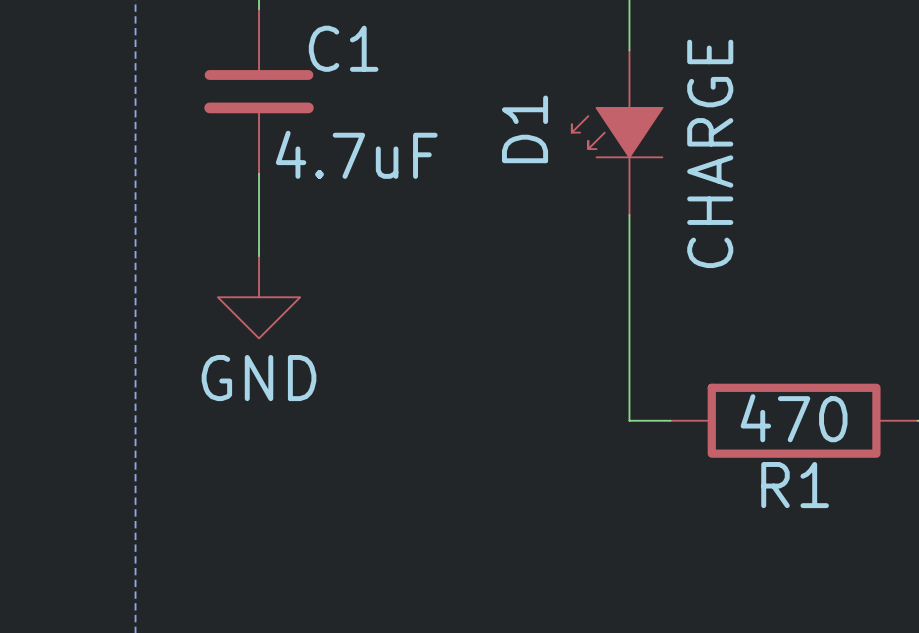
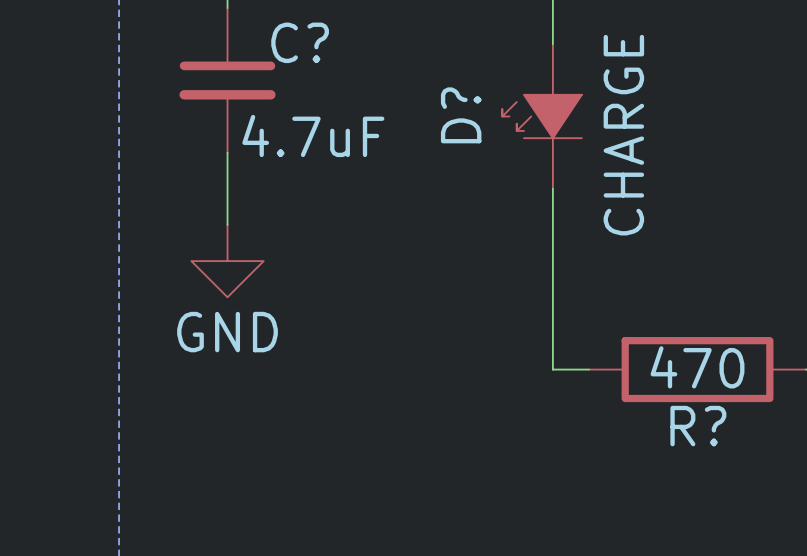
C1 name: C1 (343, 48) -> C? (300, 42)
D1 name: D1 (525, 129) -> D? (461, 115)
R1 name: R1 (795, 485) -> R? (698, 426)

